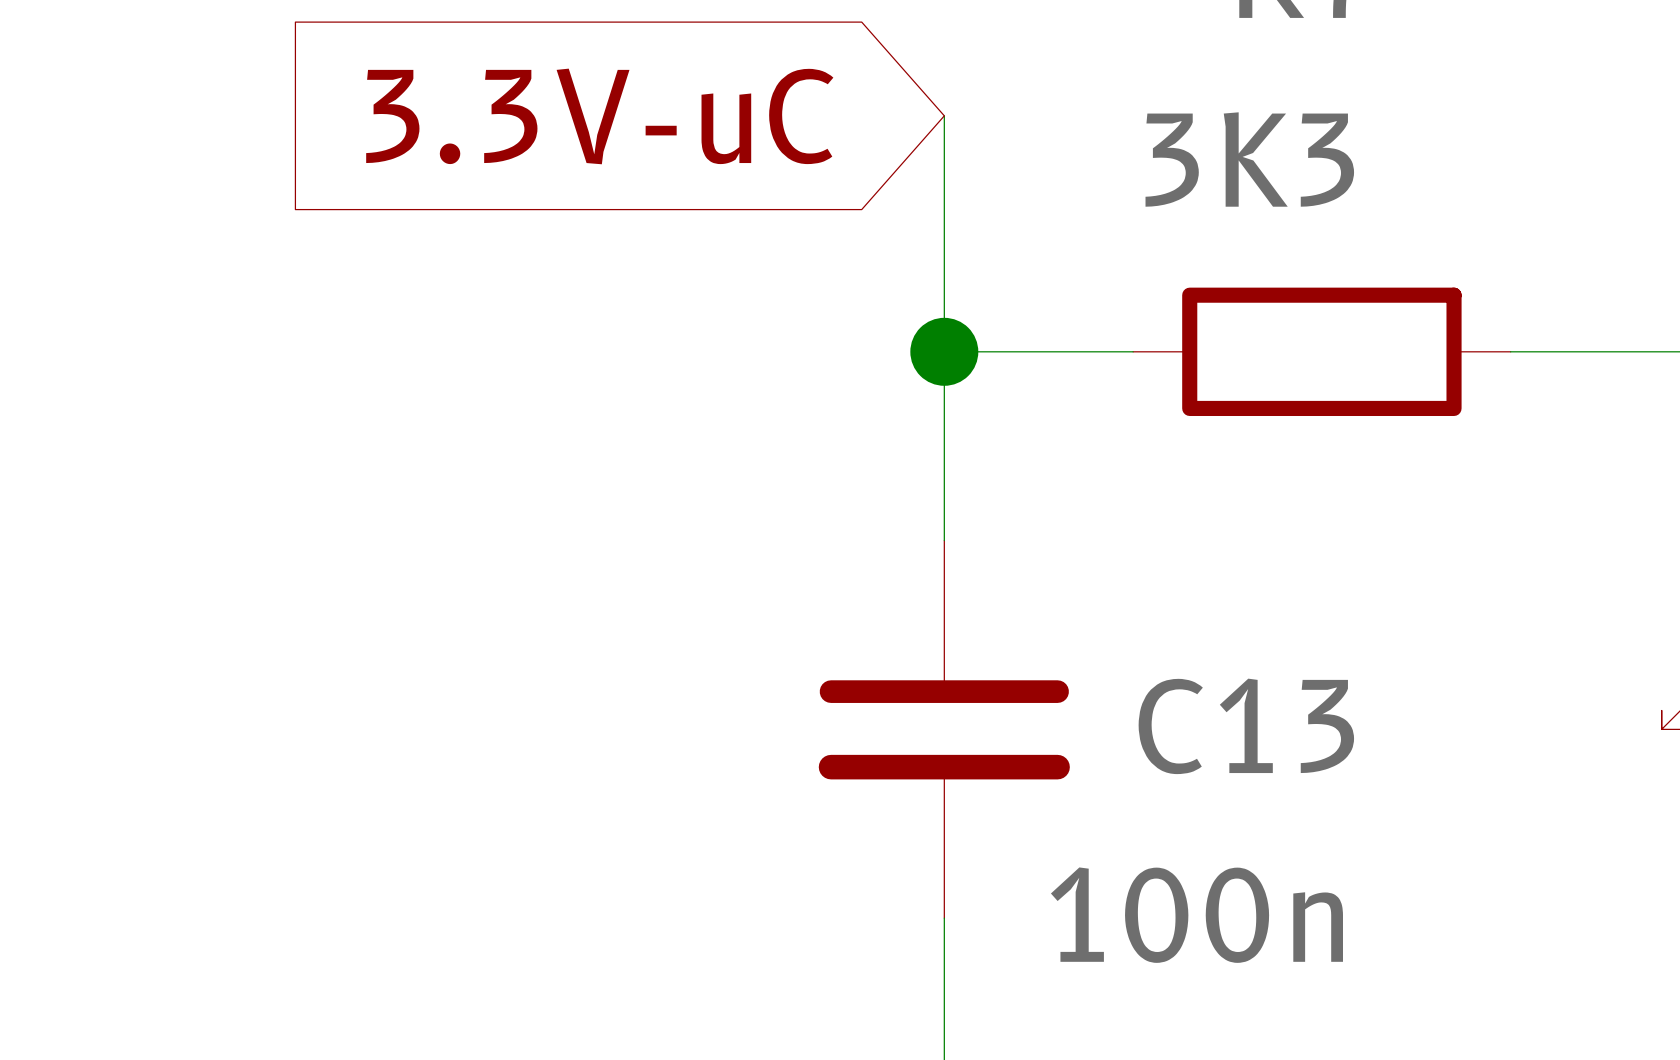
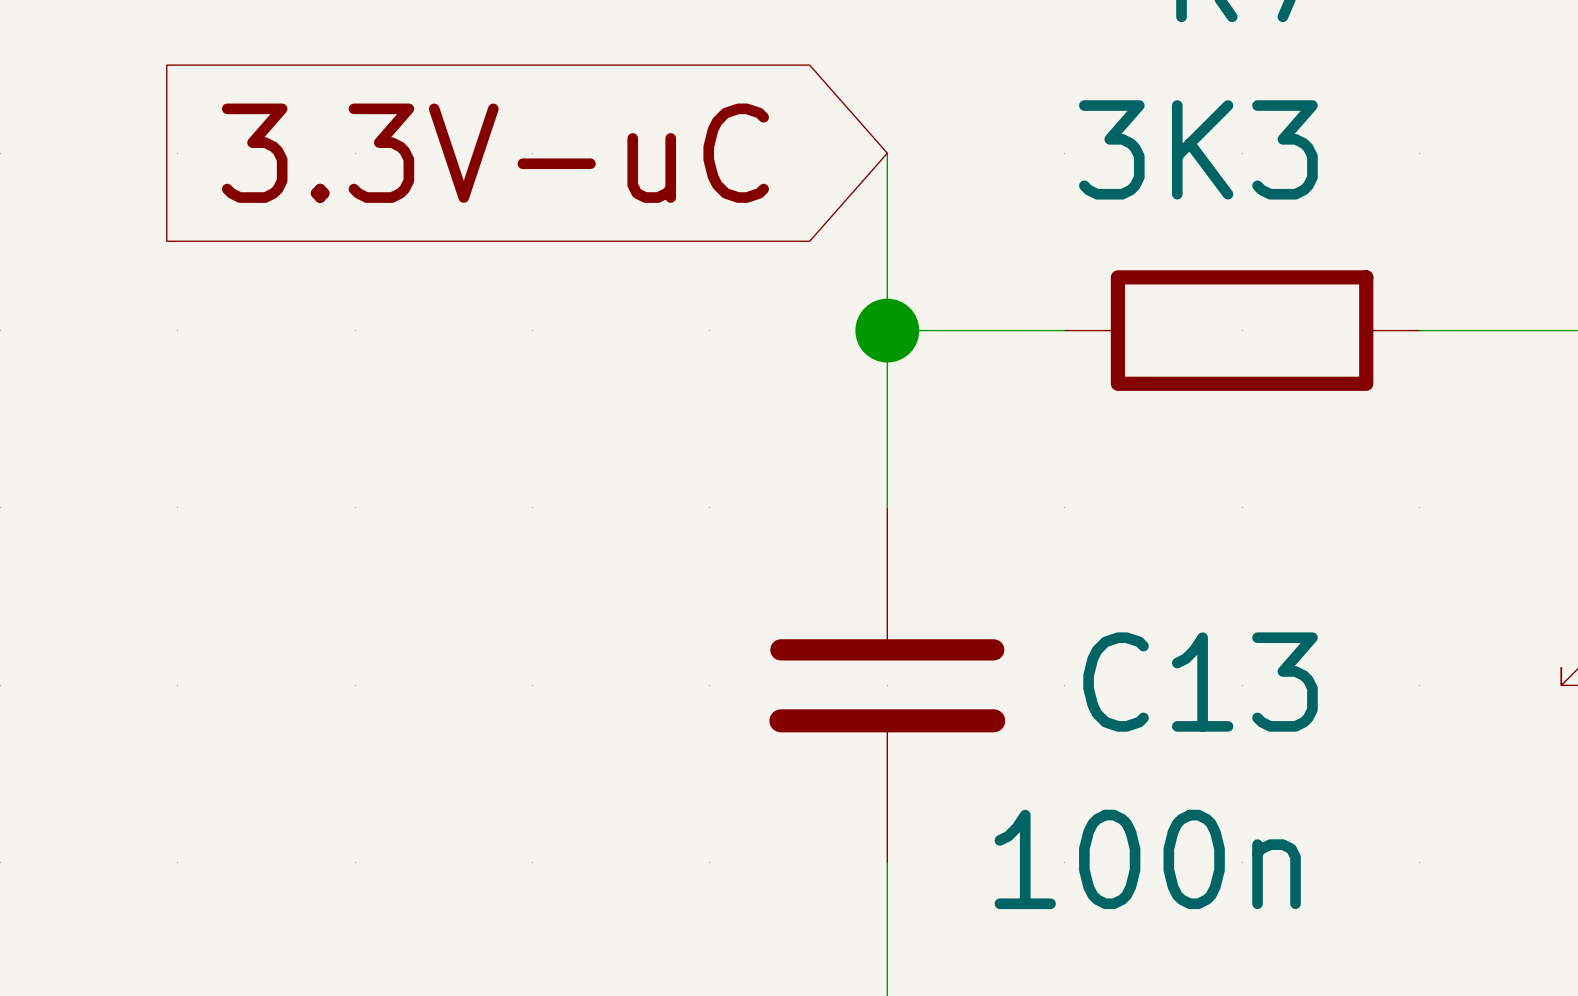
wire: (944, 115) (944, 163) -> none
global label position: 3.3V-uC (599, 116) -> 3.3V-uC (495, 153)

